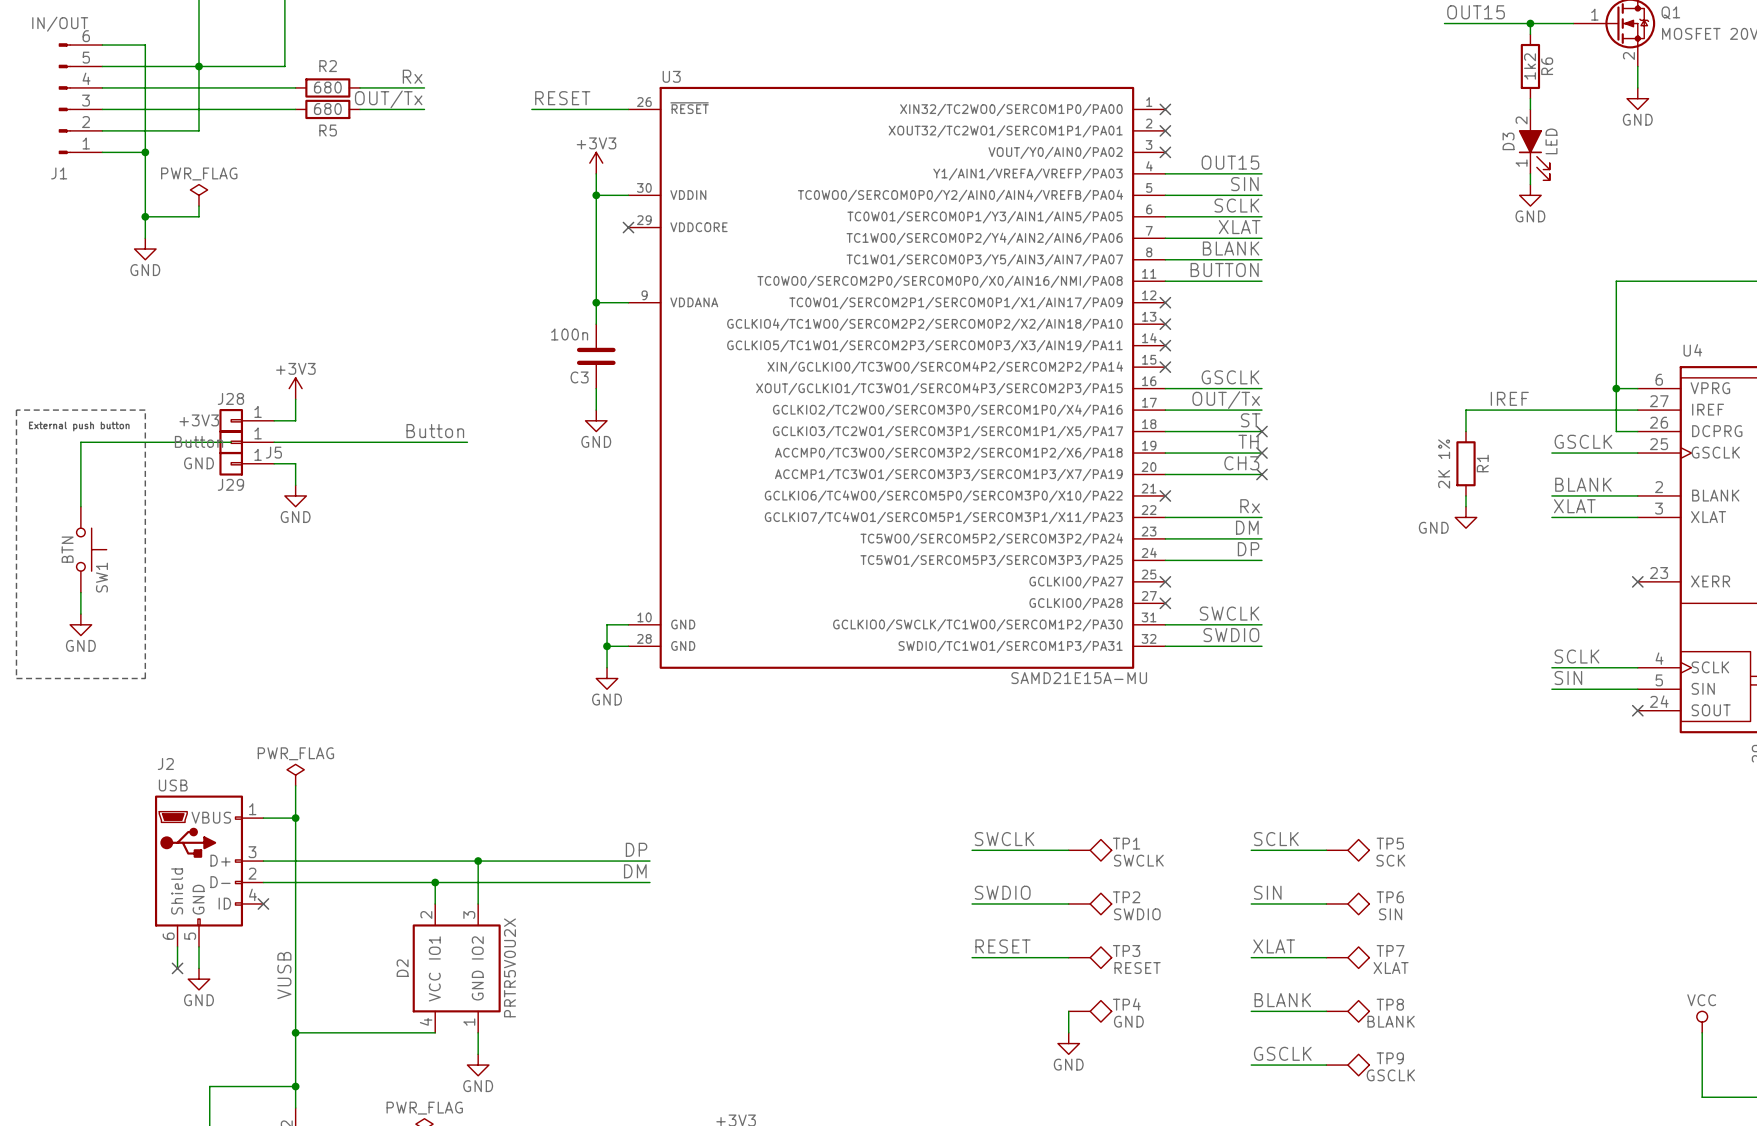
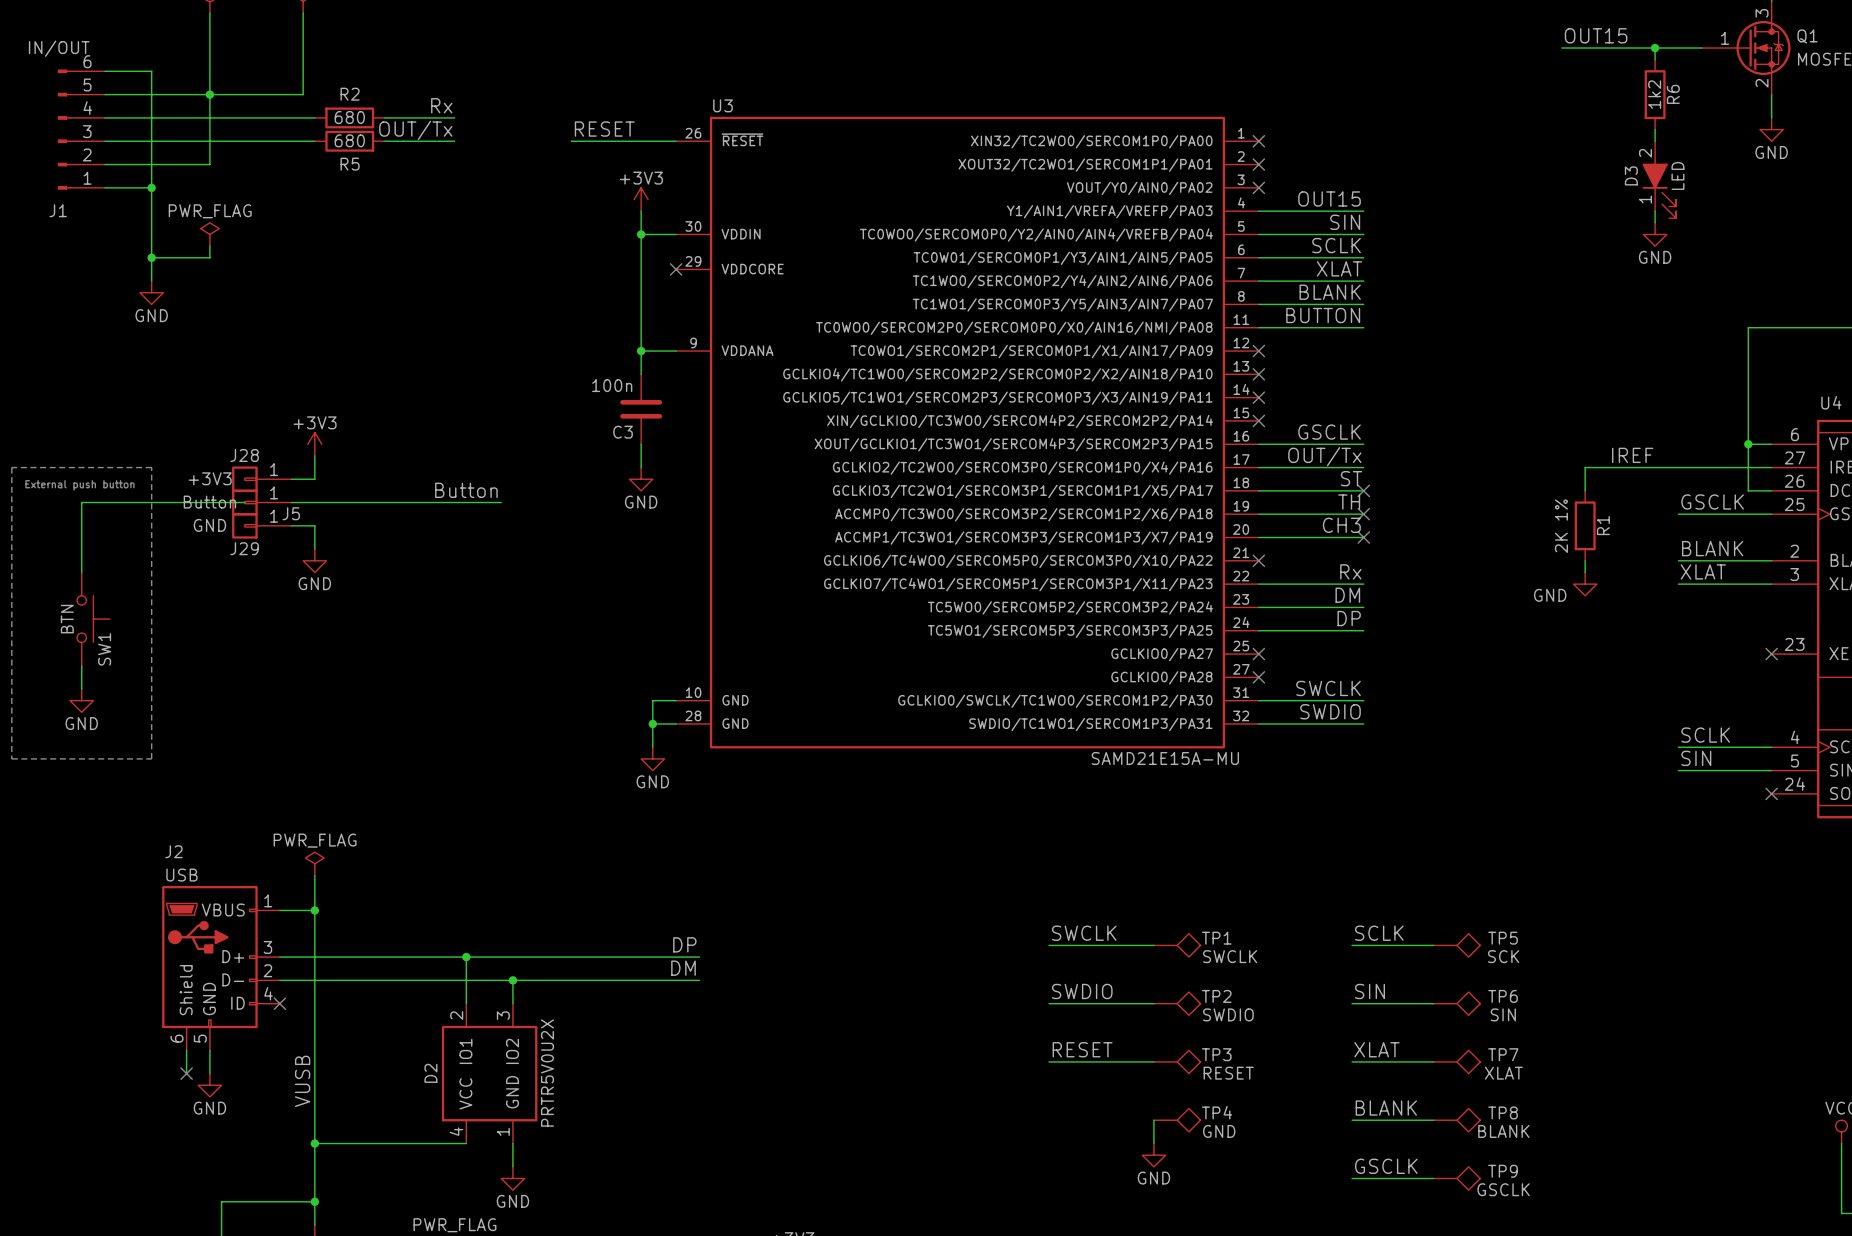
junction: none -> (466, 957)
wire: (478, 861) (478, 882) -> (466, 957) (466, 980)
junction: (478, 861) -> none
junction: (435, 882) -> none
junction: none -> (512, 980)

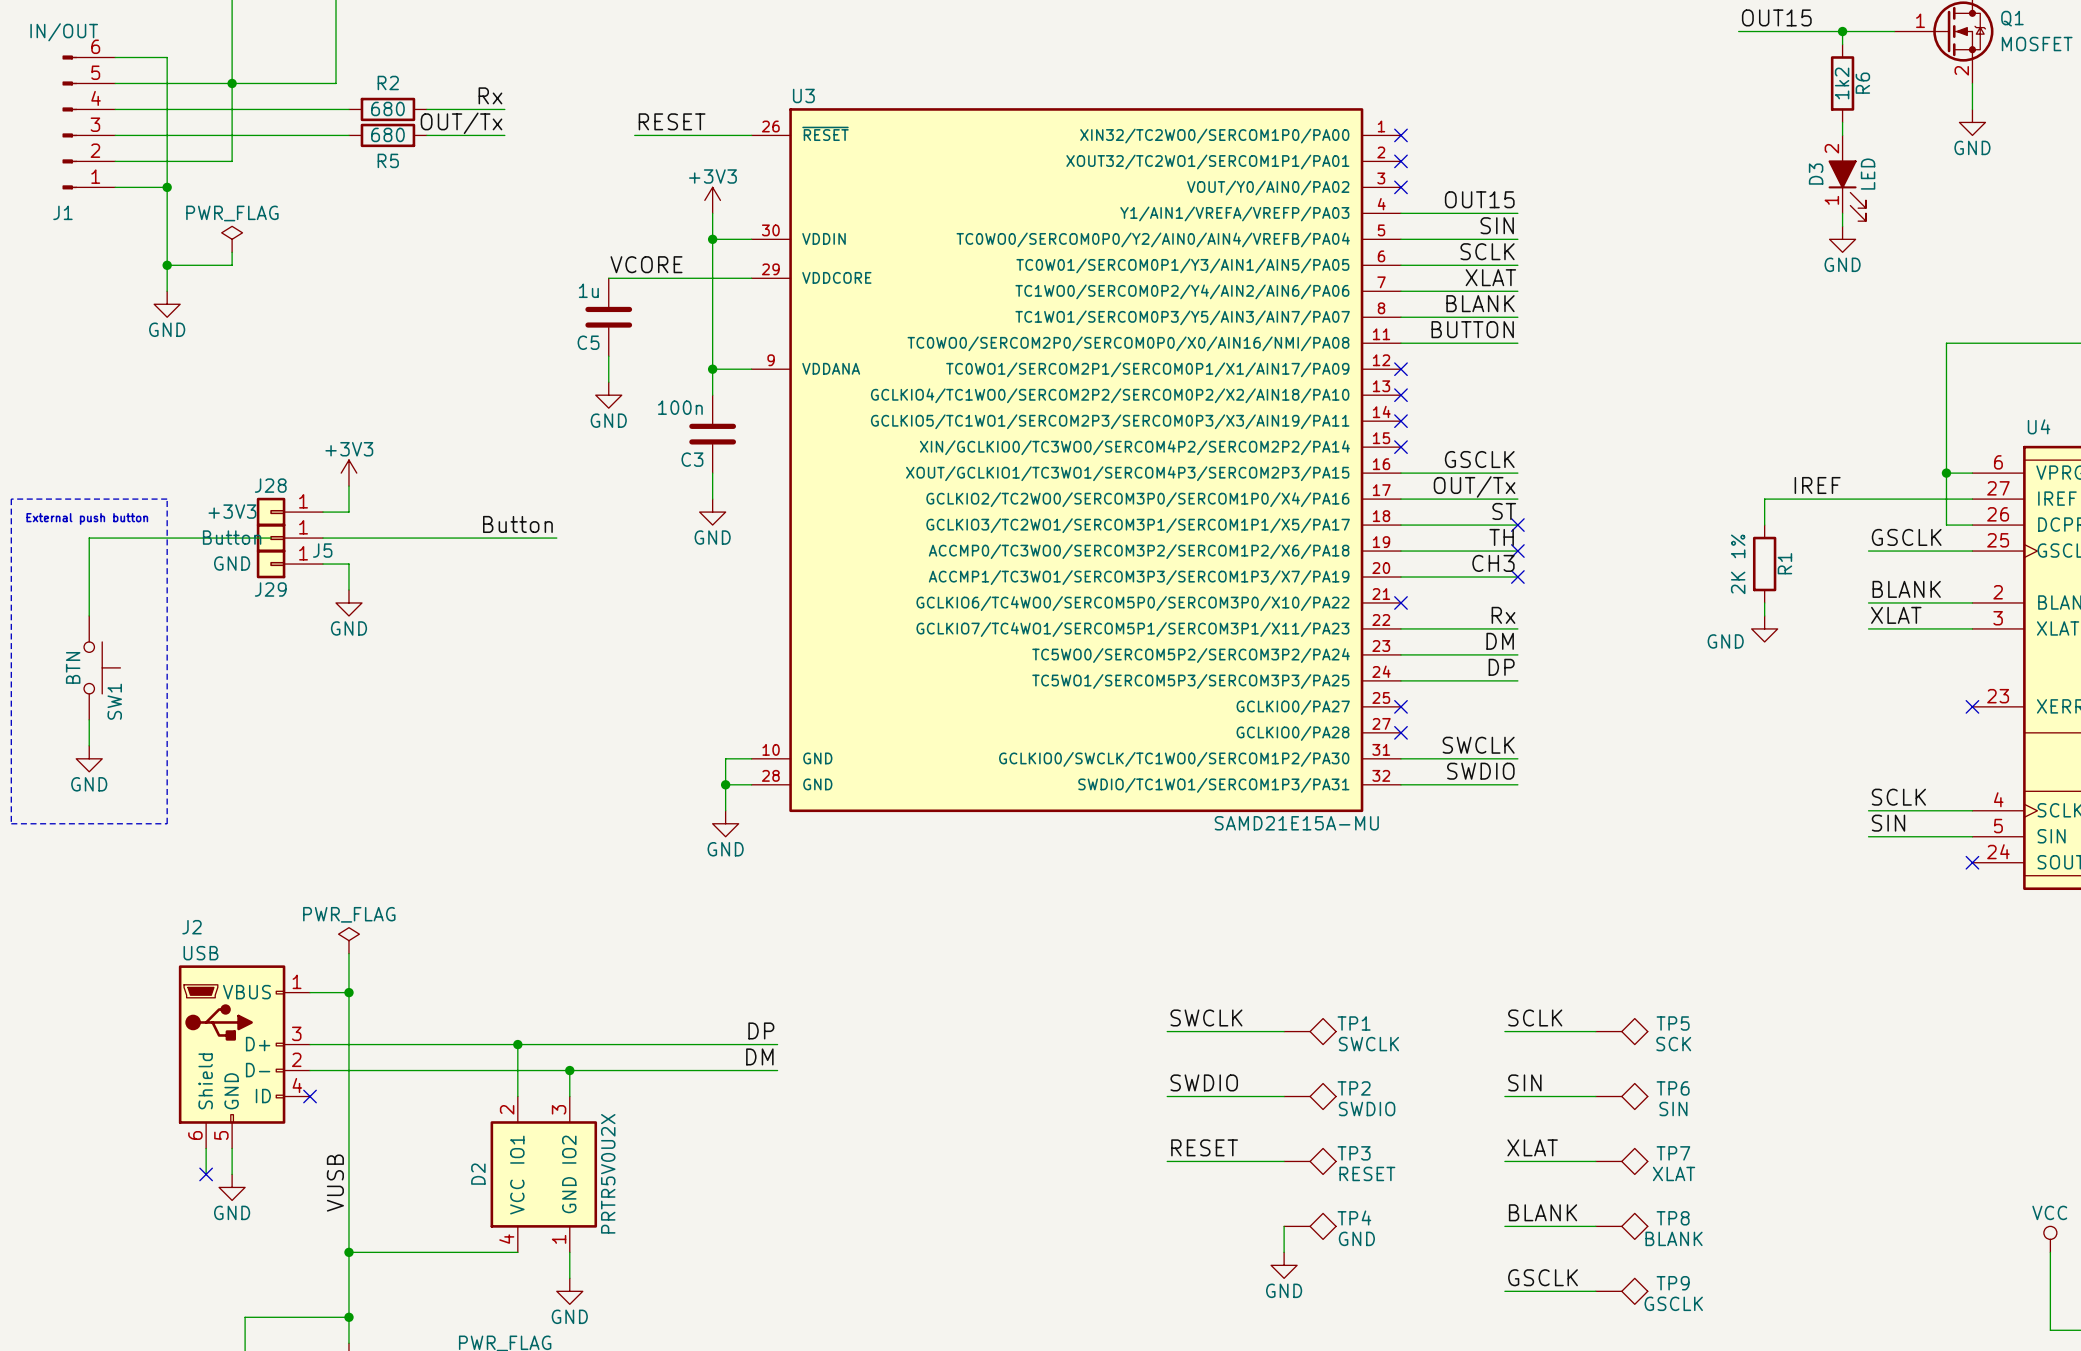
label: none -> VCORE (646, 264)
wire: none -> (608, 278) (751, 278)
no-connect mark: (676, 269) -> none
C5: none -> 1u (608, 317)
wire: none -> (608, 356) (608, 382)
power symbol: none -> GND (608, 395)

